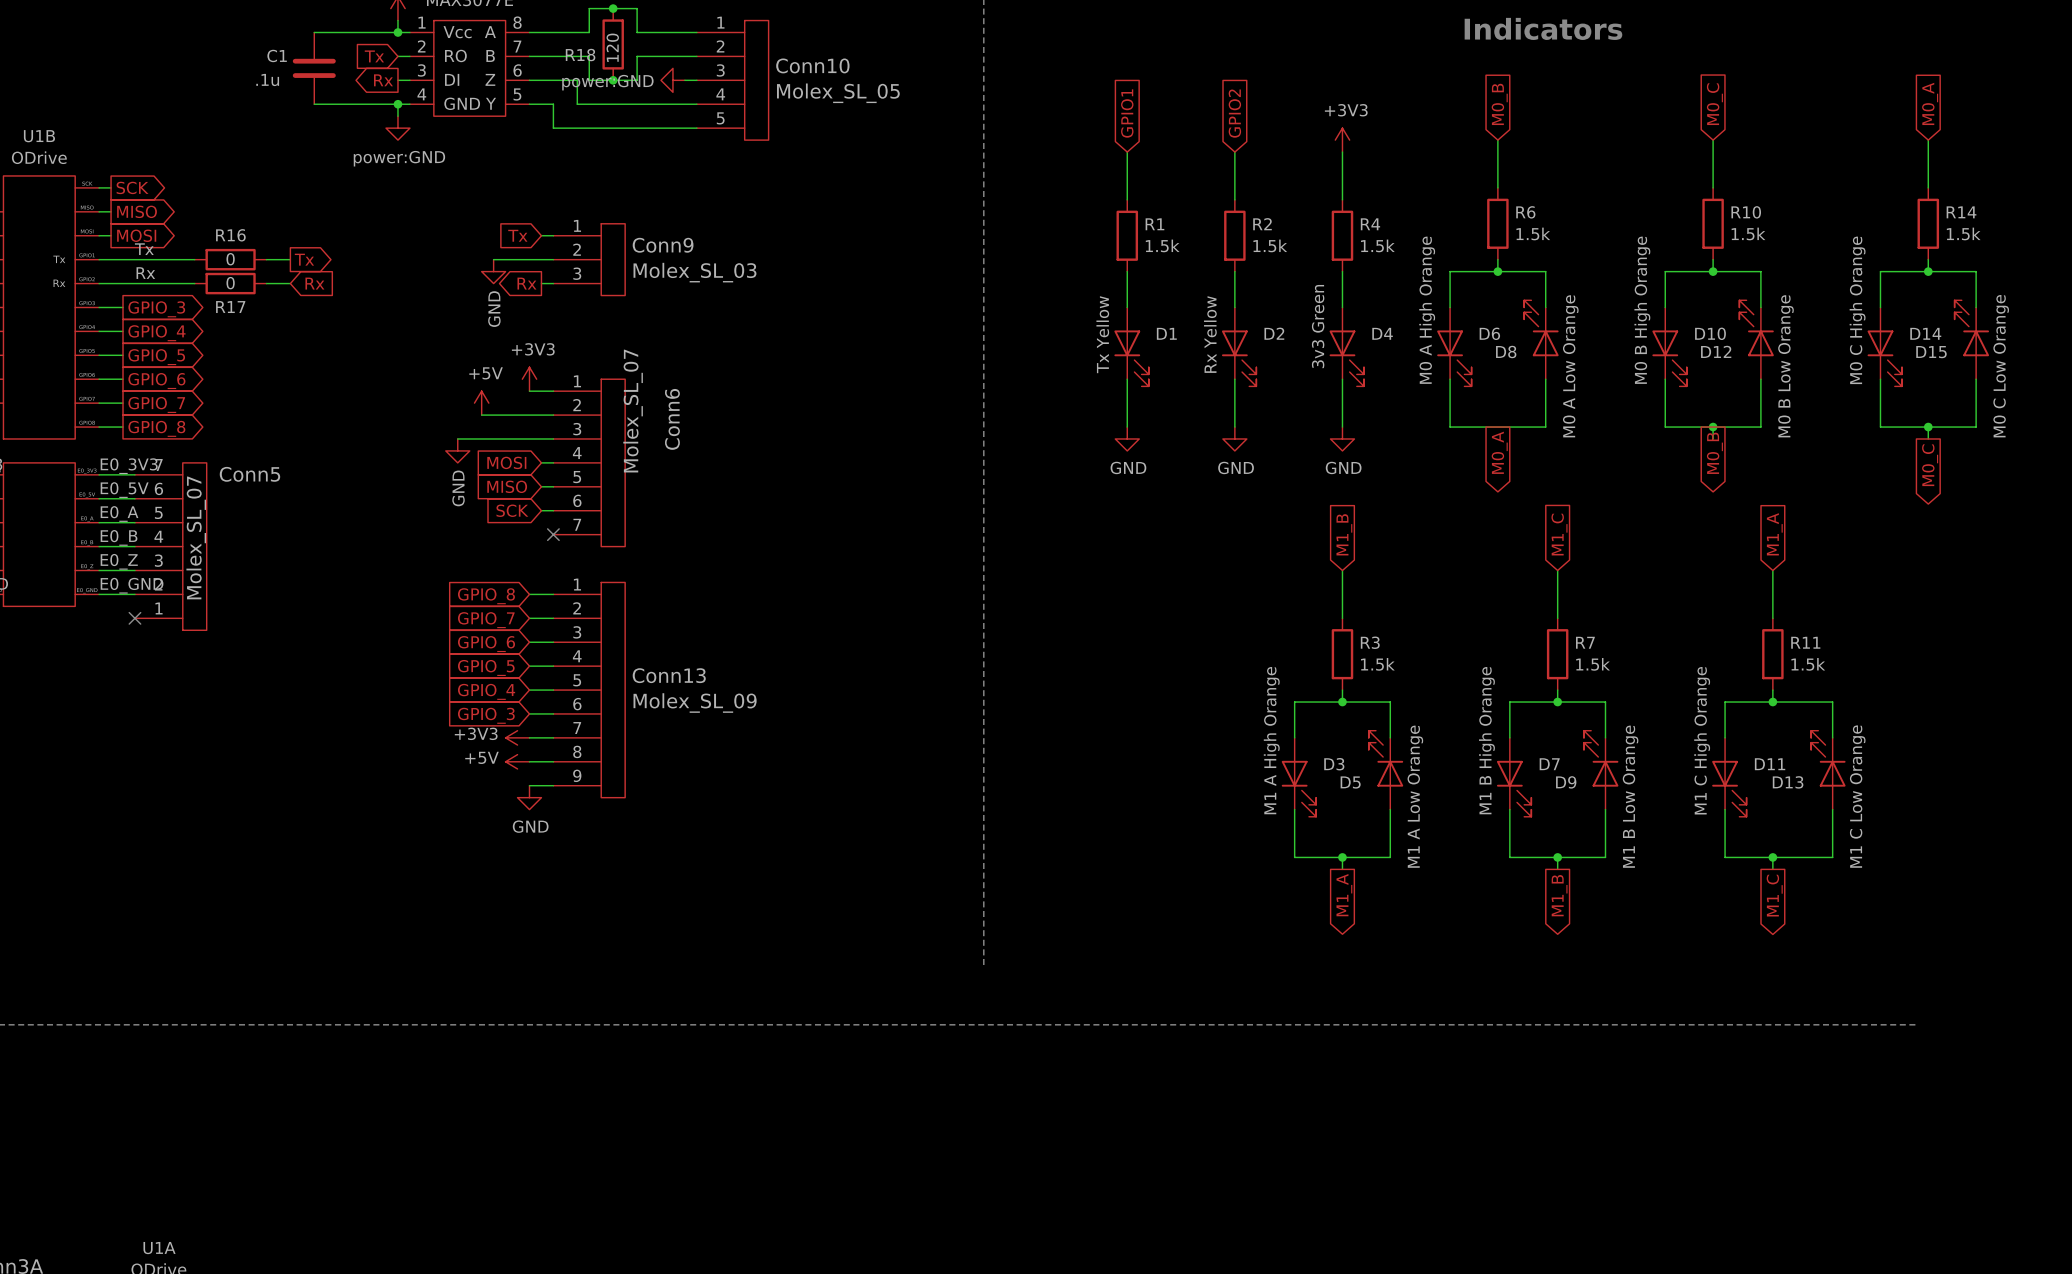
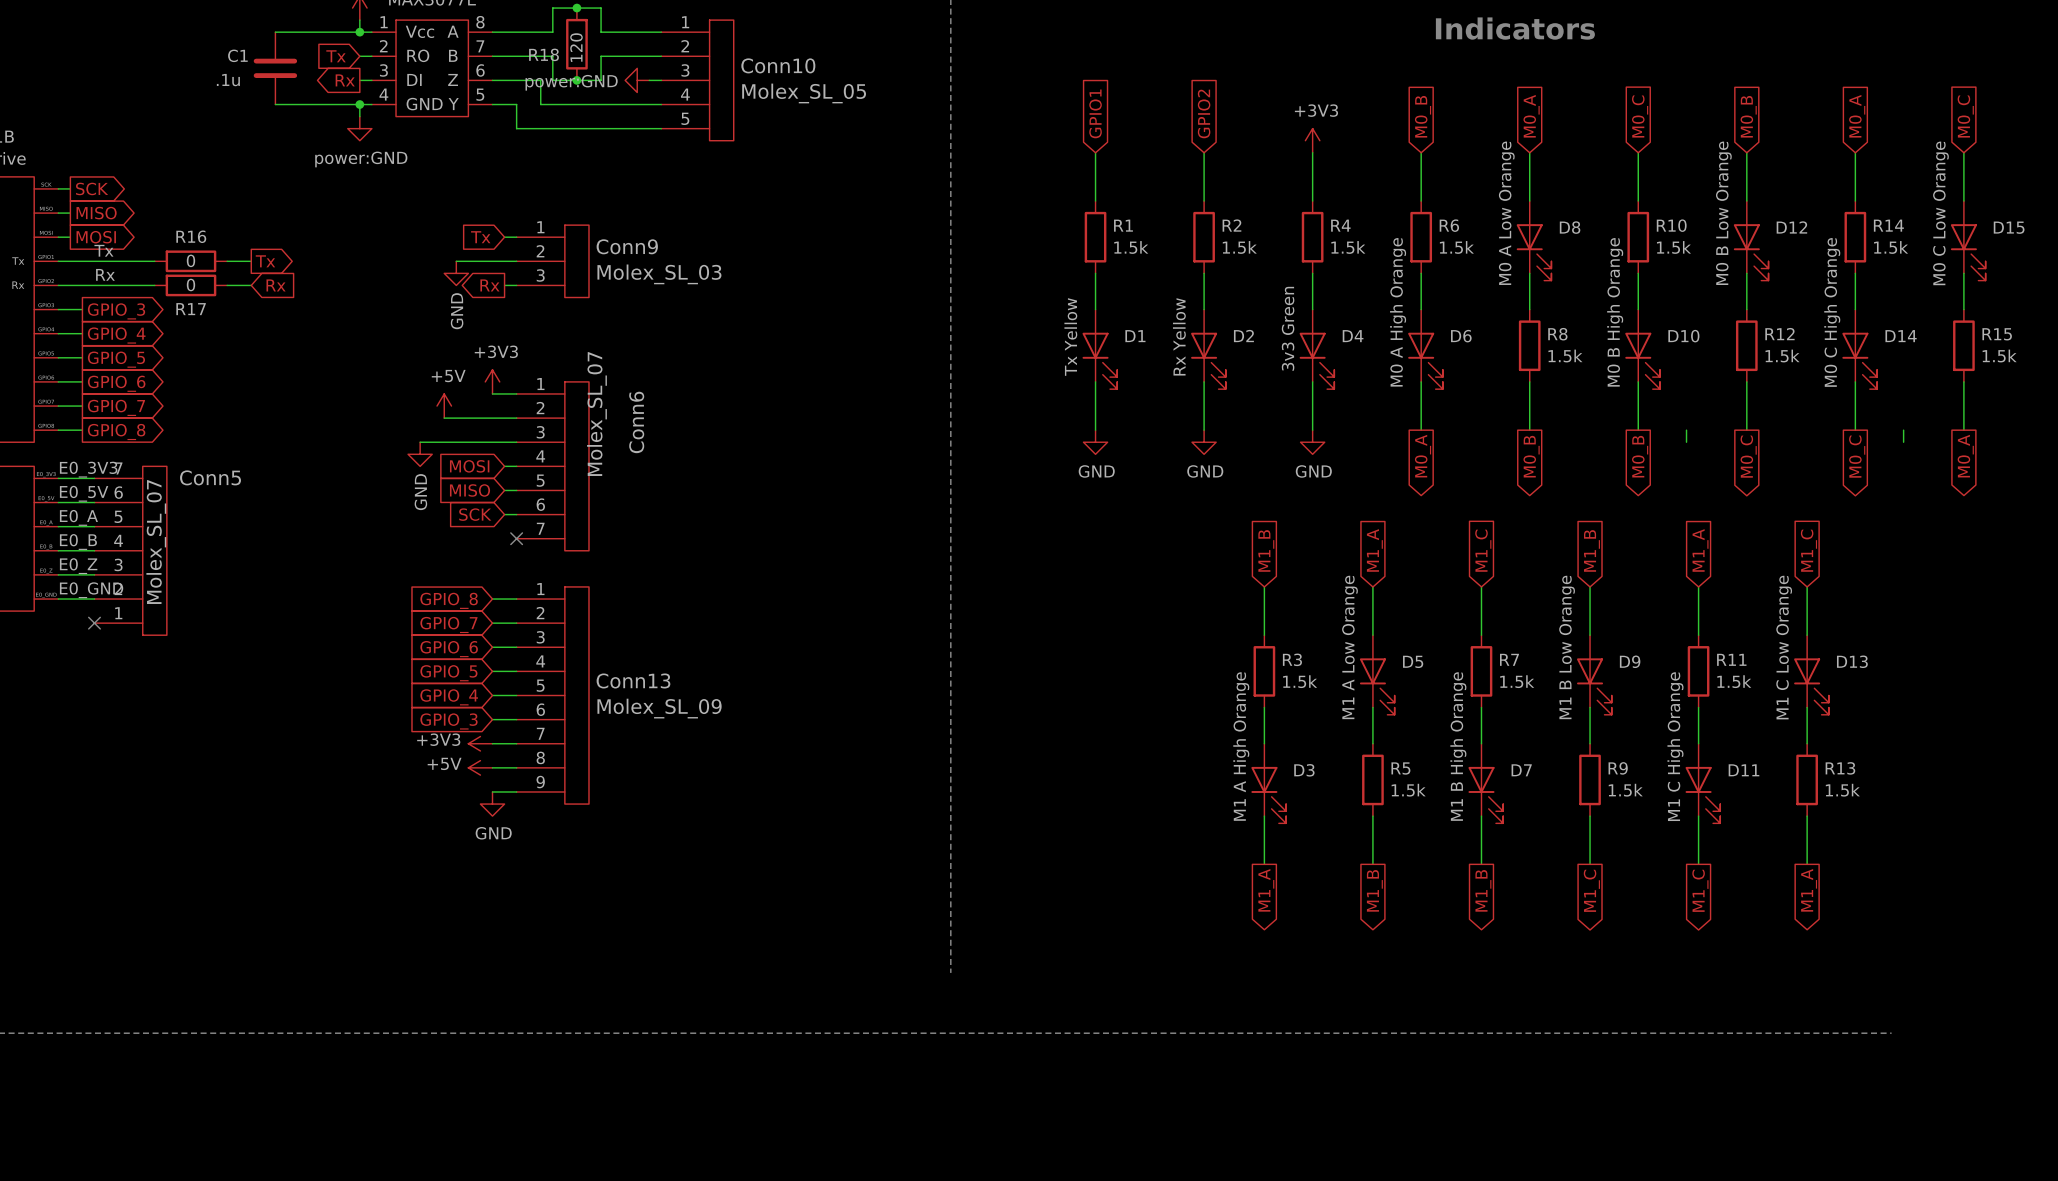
global label position: M0_A (1930, 103) -> M0_A (1857, 116)
global label position: M0_B (1499, 104) -> M0_B (1423, 116)
global label position: M0_C (1714, 104) -> M0_C (1640, 116)
global label: none -> M0_A (1531, 116)
global label: none -> M0_B (1748, 116)
global label: none -> M0_C (1965, 116)
wire: (1497, 140) (1497, 187) -> (1421, 152) (1421, 201)
wire: (1713, 140) (1713, 187) -> (1638, 152) (1638, 201)
wire: (1928, 140) (1928, 187) -> (1855, 152) (1855, 201)
wire: none -> (1529, 152) (1529, 201)
wire: none -> (1746, 152) (1746, 201)
wire: none -> (1963, 152) (1963, 201)
R6 position: (1497, 223) -> (1421, 237)
R10 position: (1713, 223) -> (1638, 237)
R14 position: (1928, 223) -> (1855, 237)
wire: (1497, 259) (1497, 271) -> none
wire: (1713, 259) (1713, 271) -> none
wire: (1928, 259) (1928, 271) -> none
wire: (1450, 271) (1545, 271) (1545, 307) -> none
junction: (1497, 271) -> none
wire: none -> (1529, 273) (1529, 309)
wire: (1665, 271) (1760, 271) (1760, 307) -> none
junction: (1713, 271) -> none
wire: none -> (1746, 273) (1746, 309)
wire: (1880, 271) (1976, 271) (1976, 307) -> none
junction: (1928, 271) -> none
wire: none -> (1963, 273) (1963, 309)
D8 rotation: 0° (1541, 328) -> 180° (1534, 252)
D12 rotation: 0° (1756, 328) -> 180° (1751, 252)
D15 rotation: 0° (1971, 328) -> 180° (1968, 252)
D8 position: (1541, 339) -> (1534, 240)
D12 position: (1756, 339) -> (1751, 240)
D15 position: (1971, 339) -> (1968, 240)
R8: none -> 1.5k (1529, 345)
R12: none -> 1.5k (1746, 345)
R15: none -> 1.5k (1963, 345)
wire: (1545, 379) (1545, 427) (1450, 427) -> none
wire: none -> (1529, 381) (1529, 430)
wire: (1760, 379) (1760, 427) (1665, 427) -> none
wire: none -> (1746, 381) (1746, 430)
wire: (1976, 379) (1976, 427) (1880, 427) -> none
wire: none -> (1963, 381) (1963, 430)
junction: (1713, 427) -> none
junction: (1928, 427) -> none
global label position: M0_A (1499, 452) -> M0_A (1423, 456)
global label: none -> M0_A (1965, 456)
global label: none -> M0_B (1531, 456)
global label position: M0_B (1714, 453) -> M0_B (1640, 456)
global label: none -> M0_C (1748, 456)
global label position: M0_C (1930, 465) -> M0_C (1857, 456)
global label position: M1_B (1344, 534) -> M1_B (1266, 550)
global label position: M1_C (1559, 534) -> M1_C (1483, 550)
global label position: M1_A (1774, 534) -> M1_A (1700, 550)
global label: none -> M1_A (1374, 550)
global label: none -> M1_B (1591, 550)
global label: none -> M1_C (1808, 550)
wire: (1342, 570) (1342, 618) -> (1264, 586) (1264, 635)
wire: (1557, 570) (1557, 618) -> (1481, 586) (1481, 635)
wire: (1772, 570) (1772, 618) -> (1698, 586) (1698, 635)
wire: none -> (1372, 586) (1372, 635)
wire: none -> (1590, 586) (1590, 635)
wire: none -> (1807, 586) (1807, 635)
R3 position: (1342, 654) -> (1264, 671)
R7 position: (1557, 654) -> (1481, 671)
R11 position: (1772, 654) -> (1698, 671)
wire: (1342, 690) (1342, 702) -> none
wire: (1557, 690) (1557, 702) -> none
wire: (1772, 690) (1772, 702) -> none
wire: (1294, 702) (1390, 702) (1390, 737) -> none
junction: (1342, 702) -> none
wire: none -> (1372, 707) (1372, 743)
wire: (1509, 702) (1605, 702) (1605, 737) -> none
junction: (1557, 702) -> none
wire: none -> (1590, 707) (1590, 743)
wire: (1725, 702) (1832, 702) -> none
junction: (1772, 702) -> none
D5 rotation: 0° (1385, 758) -> 180° (1377, 686)
D9 rotation: 0° (1601, 758) -> 180° (1594, 686)
D13 rotation: 0° (1828, 758) -> 180° (1811, 686)
D5 position: (1385, 770) -> (1377, 675)
D9 position: (1601, 770) -> (1594, 675)
D13 position: (1828, 770) -> (1811, 675)
R5: none -> 1.5k (1372, 779)
R9: none -> 1.5k (1590, 779)
R13: none -> 1.5k (1807, 779)
wire: (1390, 809) (1390, 857) (1294, 857) -> none
wire: none -> (1372, 816) (1372, 864)
wire: (1605, 809) (1605, 857) (1509, 857) -> none
wire: none -> (1590, 816) (1590, 864)
wire: (1342, 857) (1342, 869) -> none
junction: (1342, 857) -> none
wire: (1557, 857) (1557, 869) -> none
junction: (1557, 857) -> none
wire: (1725, 857) (1832, 857) -> none
wire: (1772, 857) (1772, 869) -> none
junction: (1772, 857) -> none
global label: none -> M1_B (1374, 890)
global label: none -> M1_C (1591, 890)
global label: none -> M1_A (1809, 890)
global label position: M1_A (1344, 895) -> M1_A (1266, 890)
global label position: M1_B (1559, 895) -> M1_B (1483, 890)
global label position: M1_C (1774, 895) -> M1_C (1700, 890)

